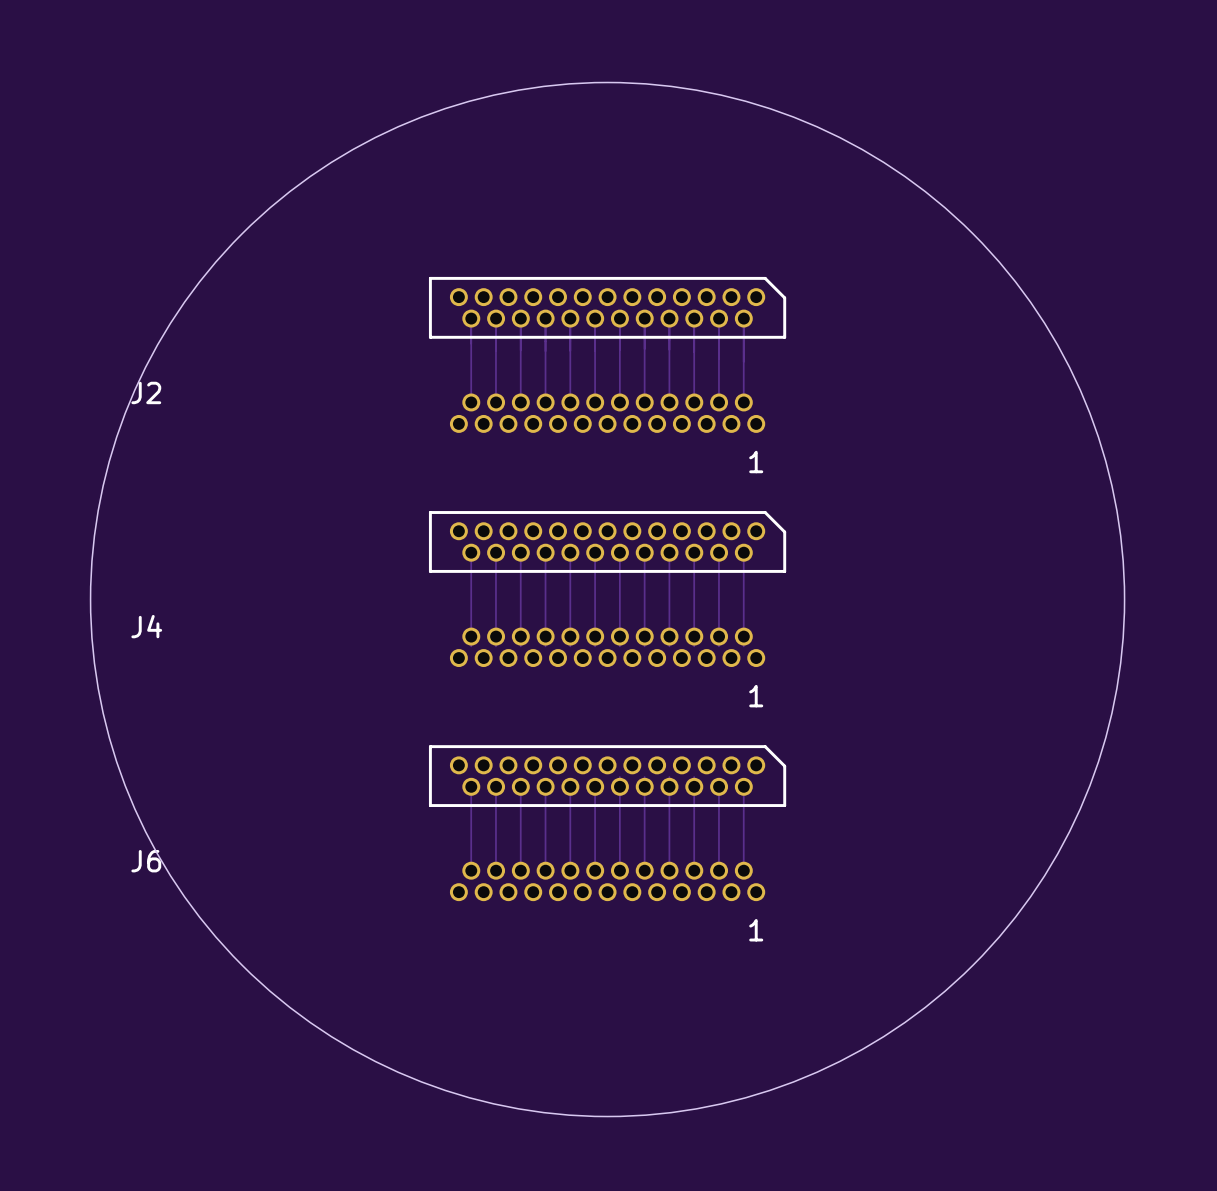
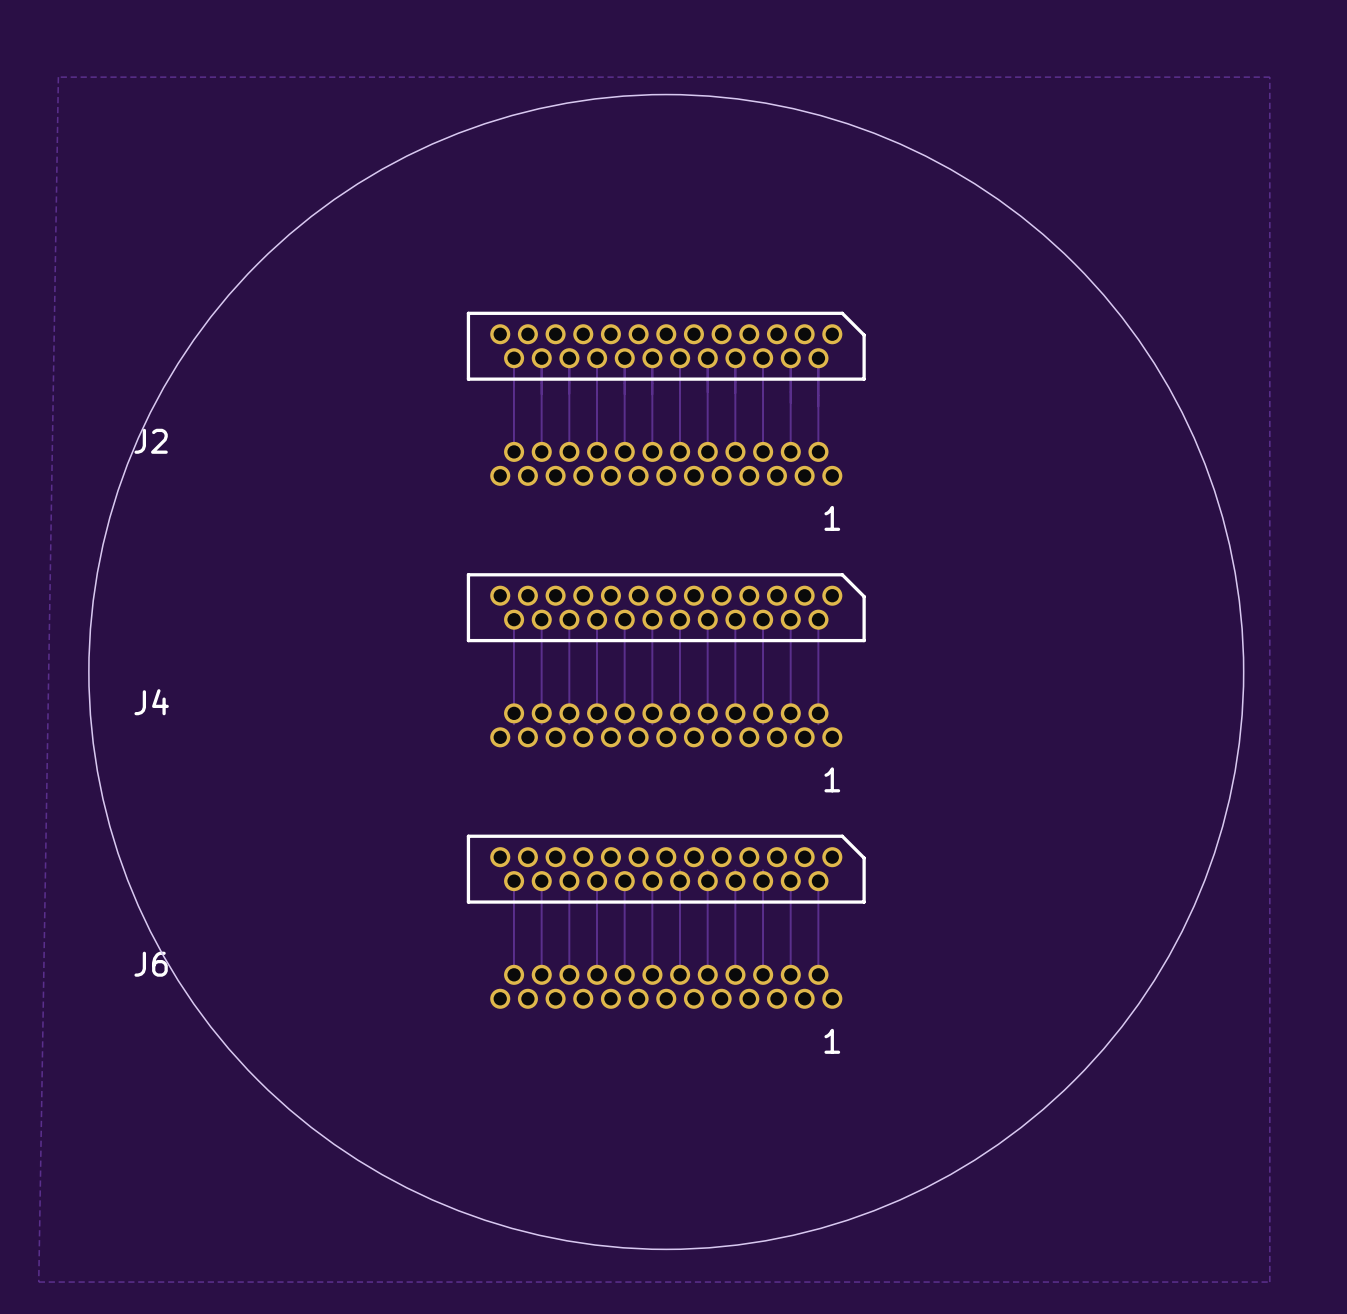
zone outline: none -> (1269, 77) (1269, 1282) (38, 1282) (58, 77) (1269, 77)

